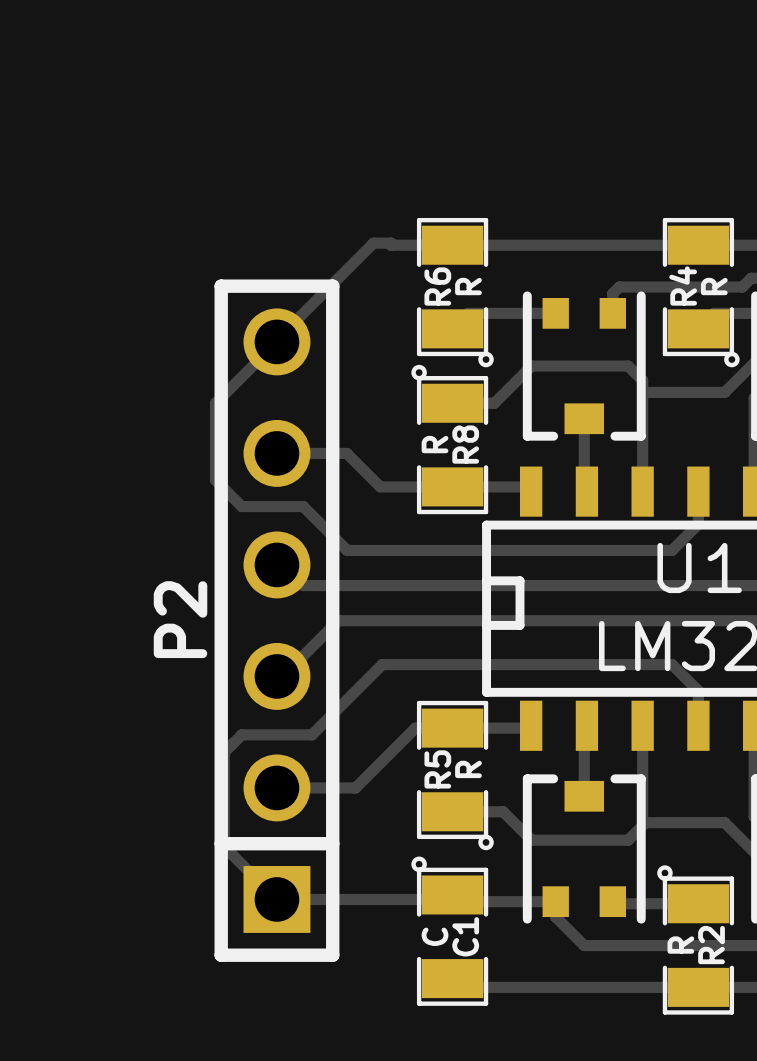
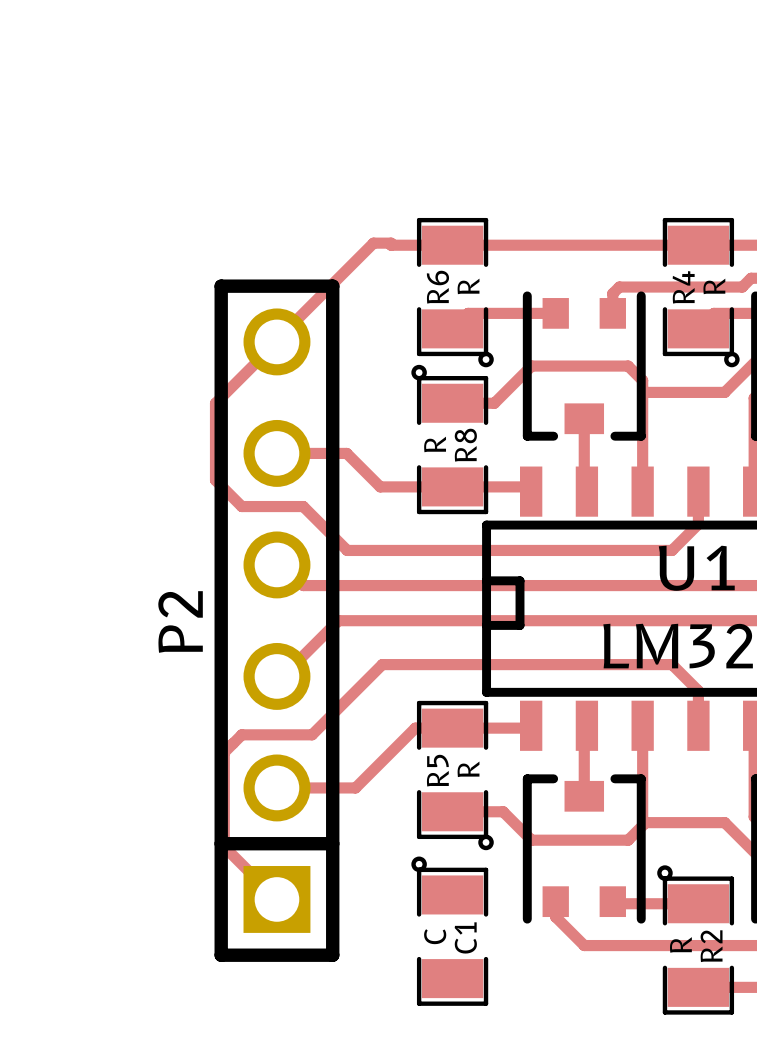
track: (276, 899) (555, 901) -> none
track: (452, 978) (461, 987) (698, 987) -> none

